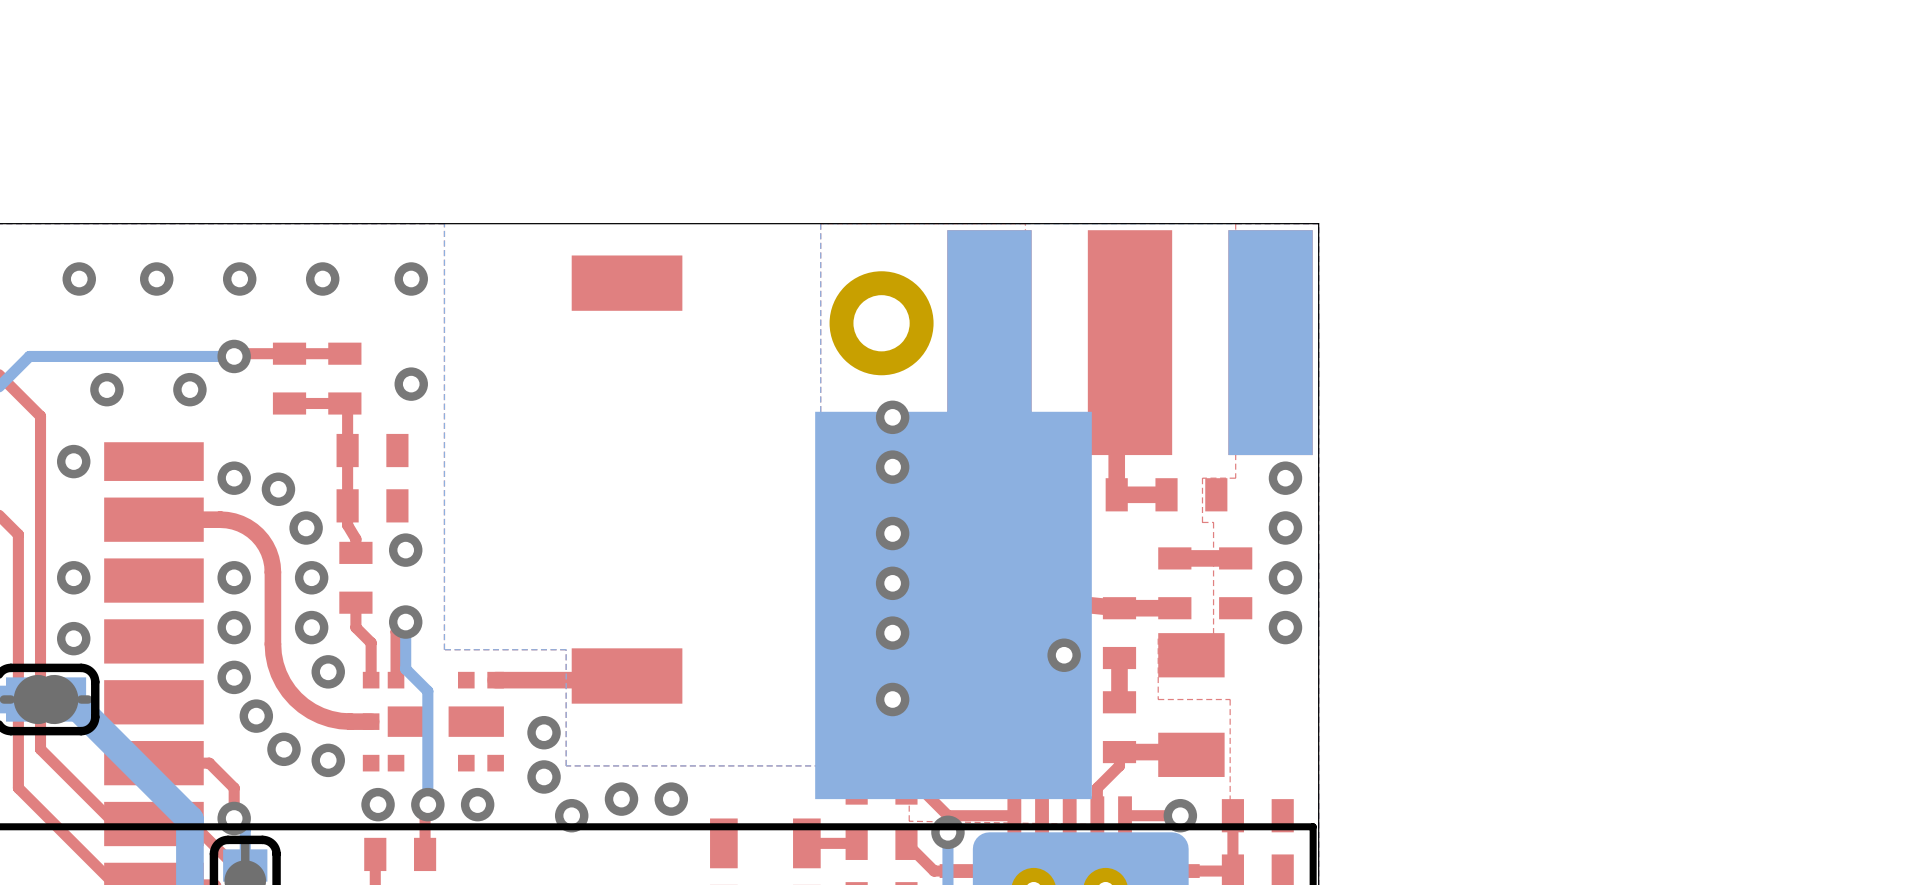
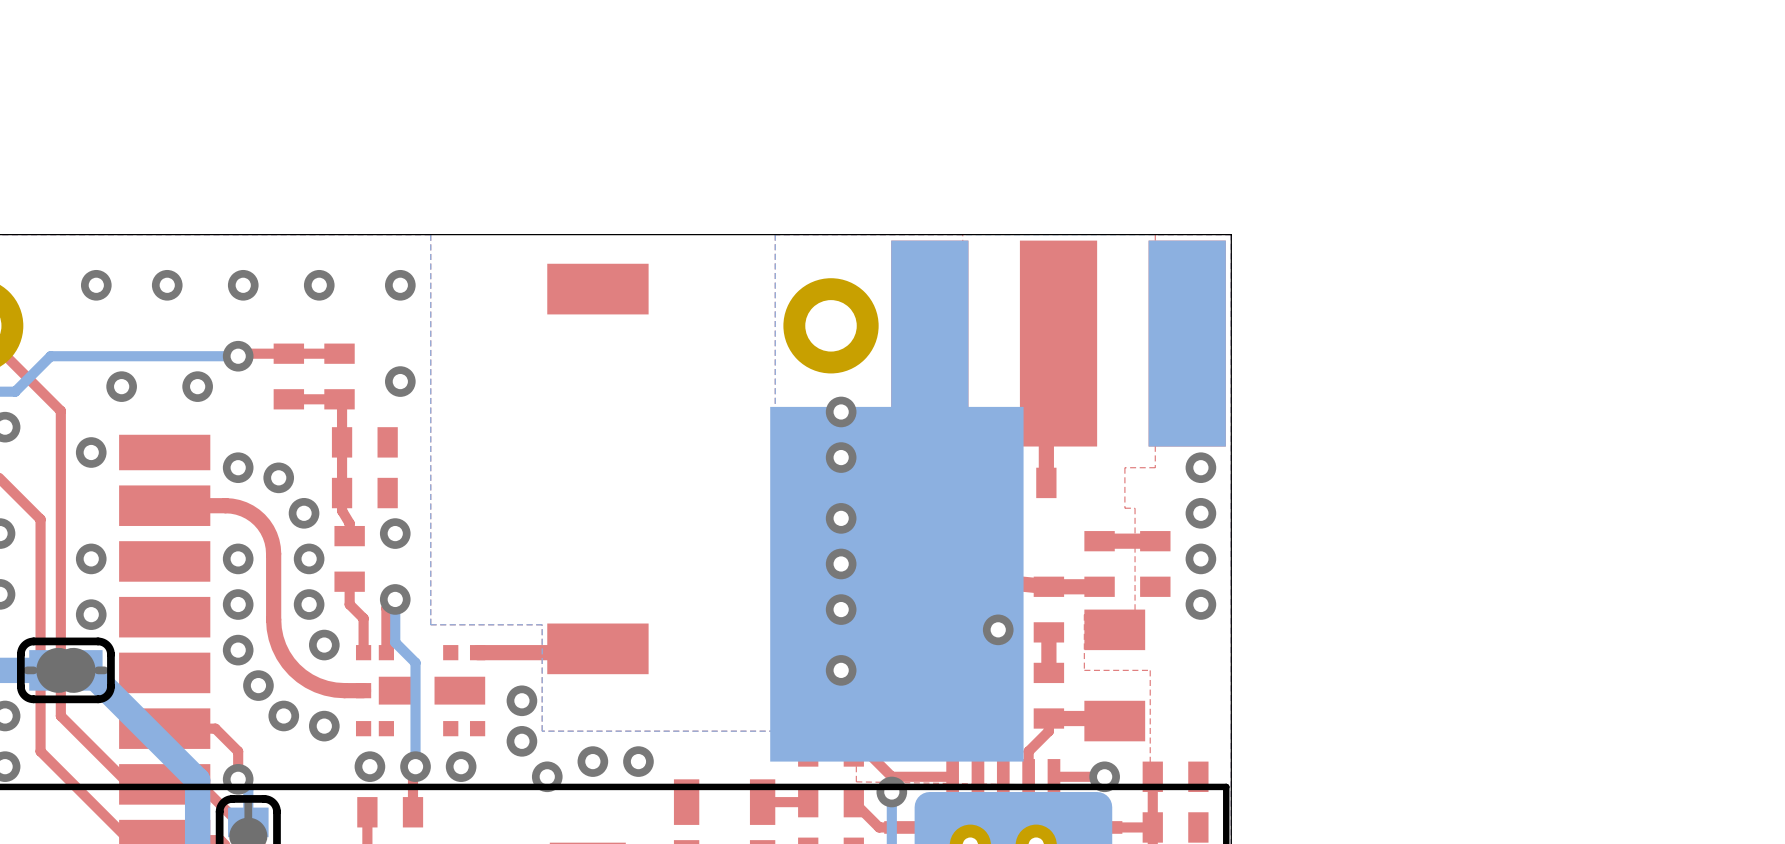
top track: (1166, 494) (1116, 494) -> none
part: (1191, 494) -> none

